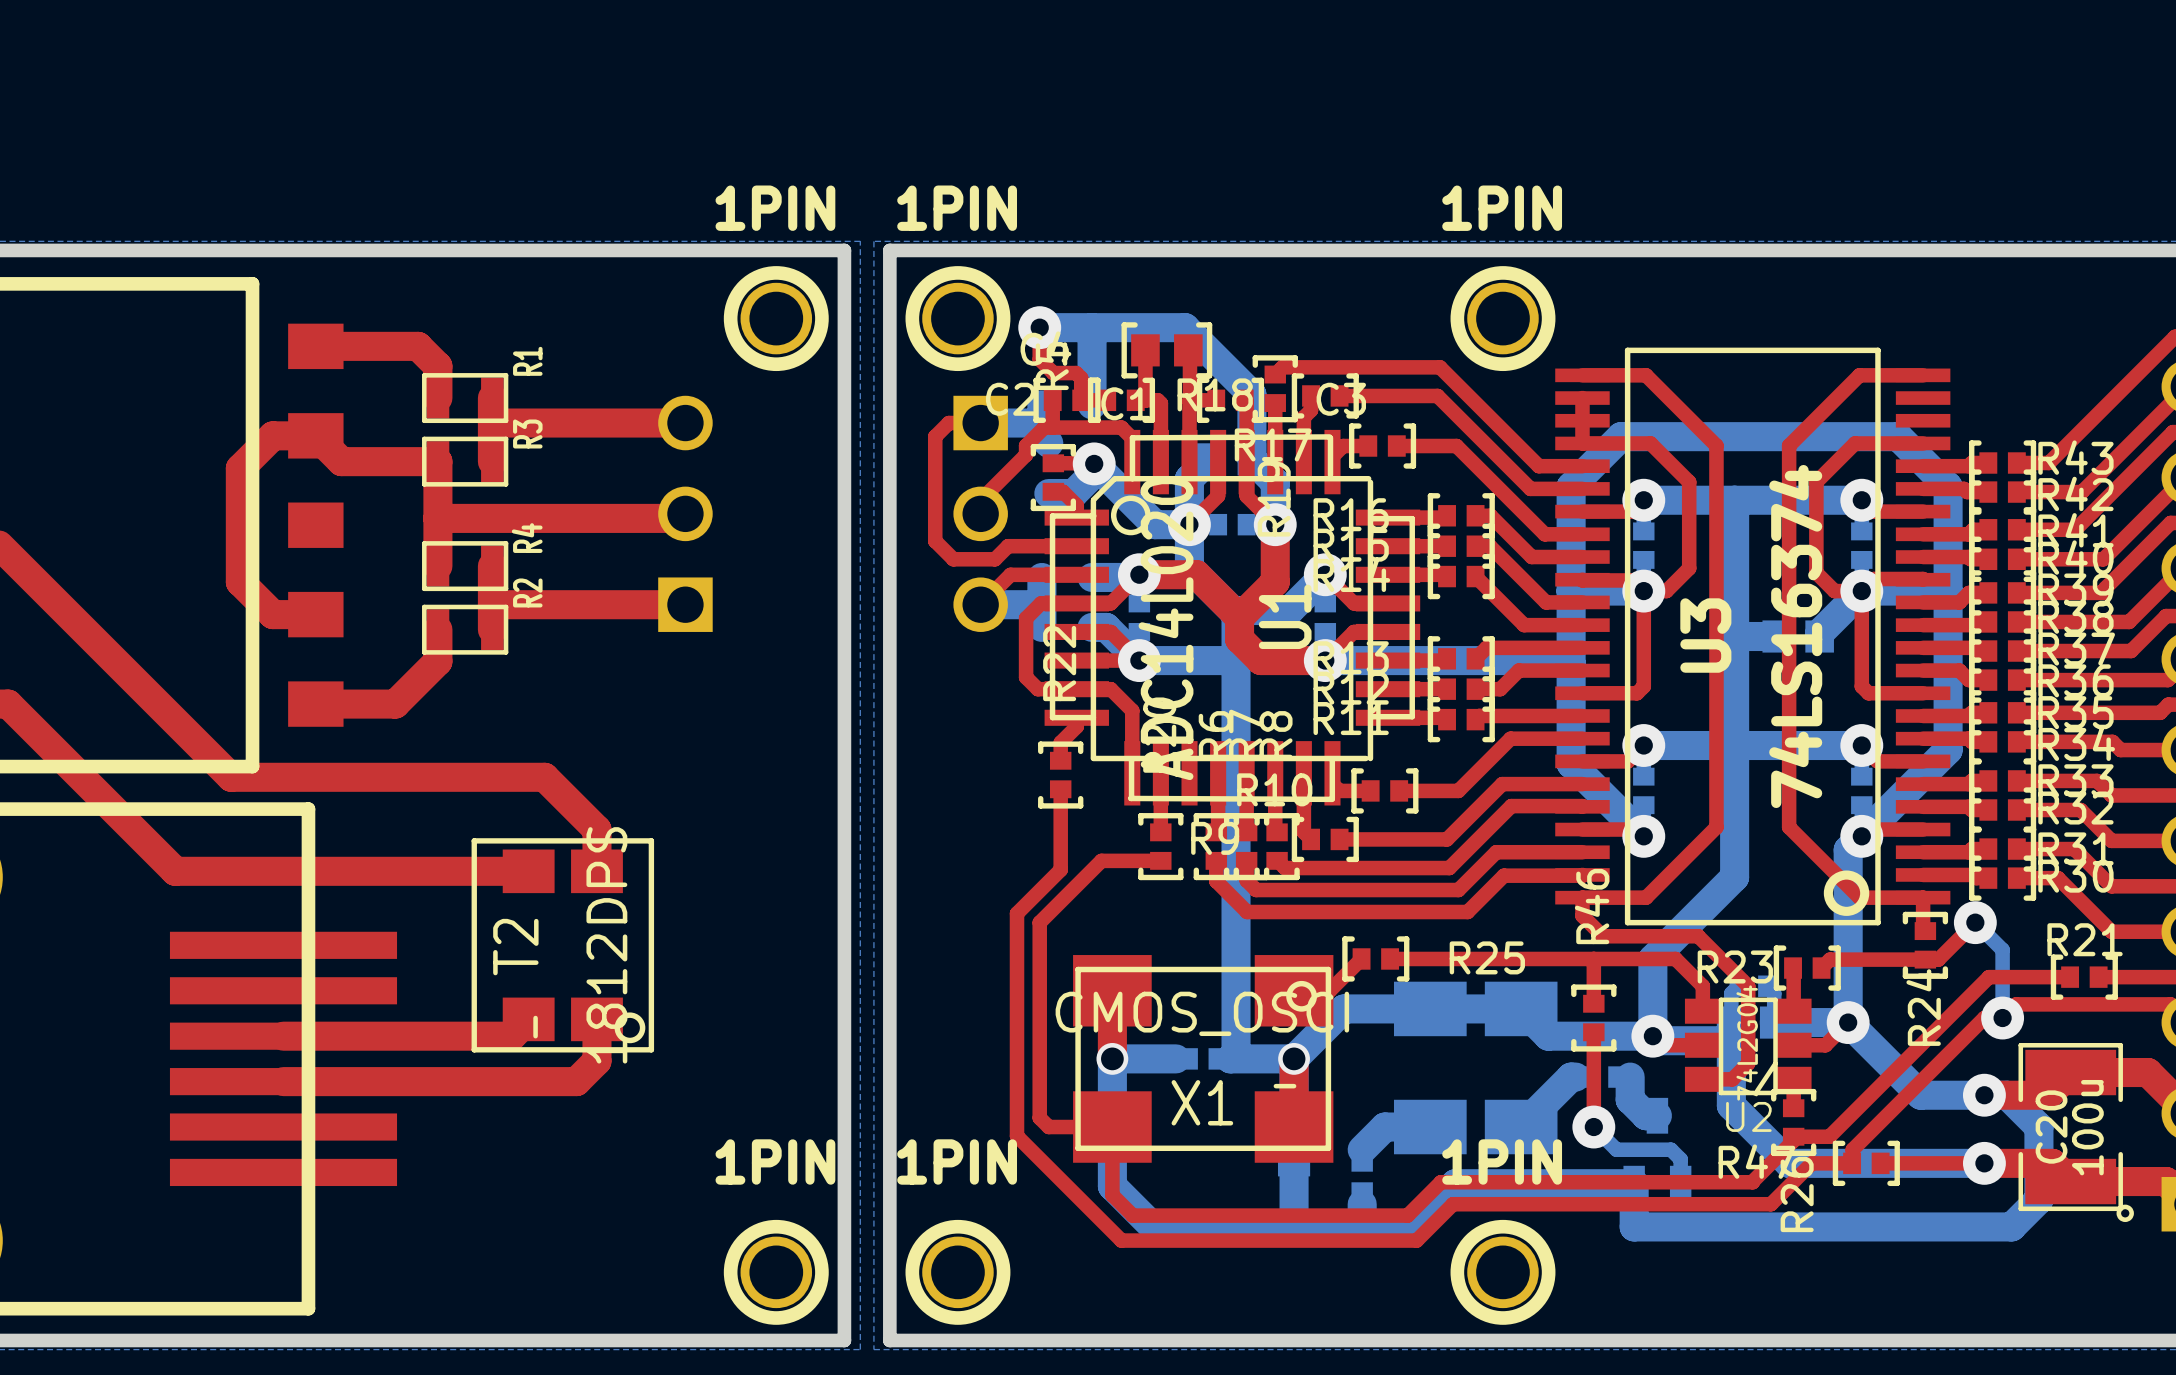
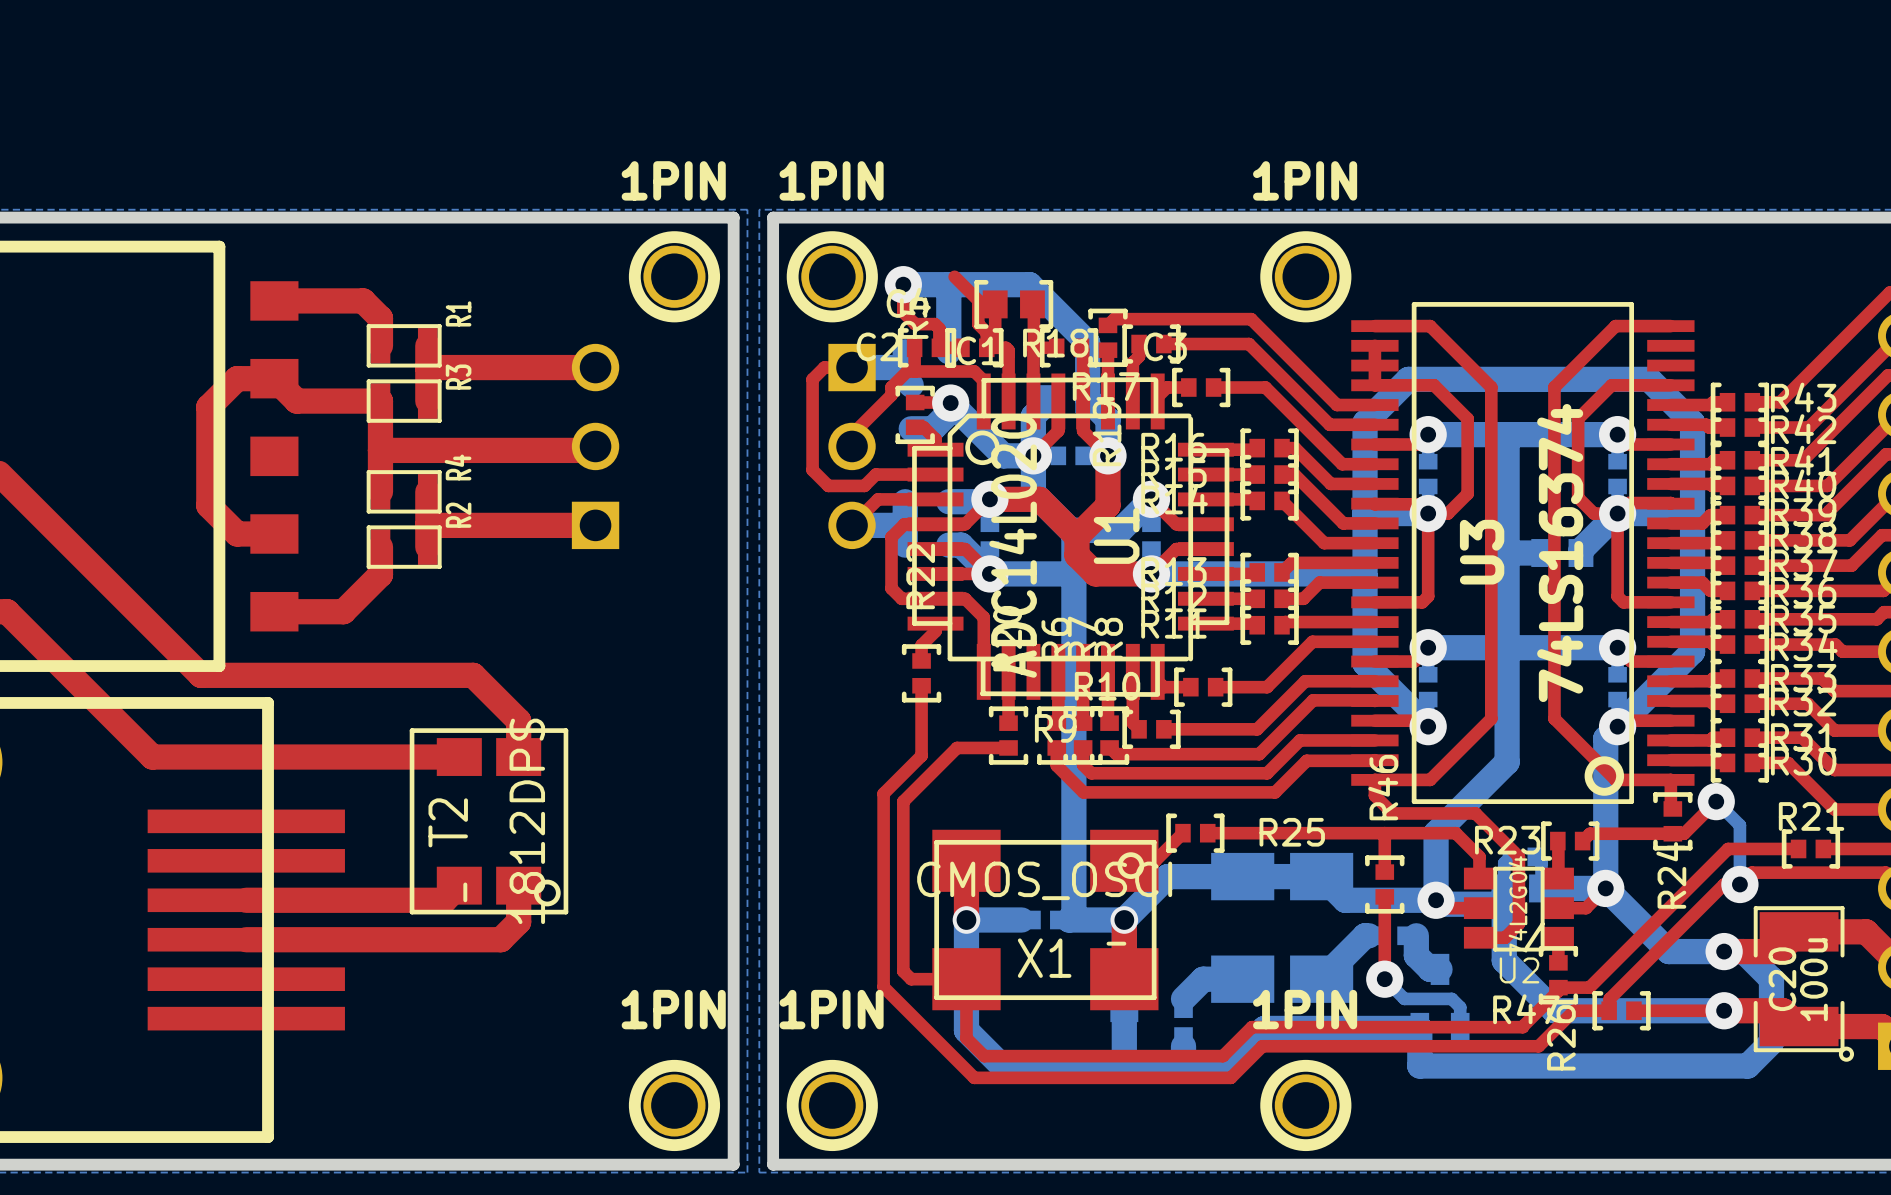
top track: none -> (954, 276) (978, 300) (978, 324) (986, 332) (986, 347)

